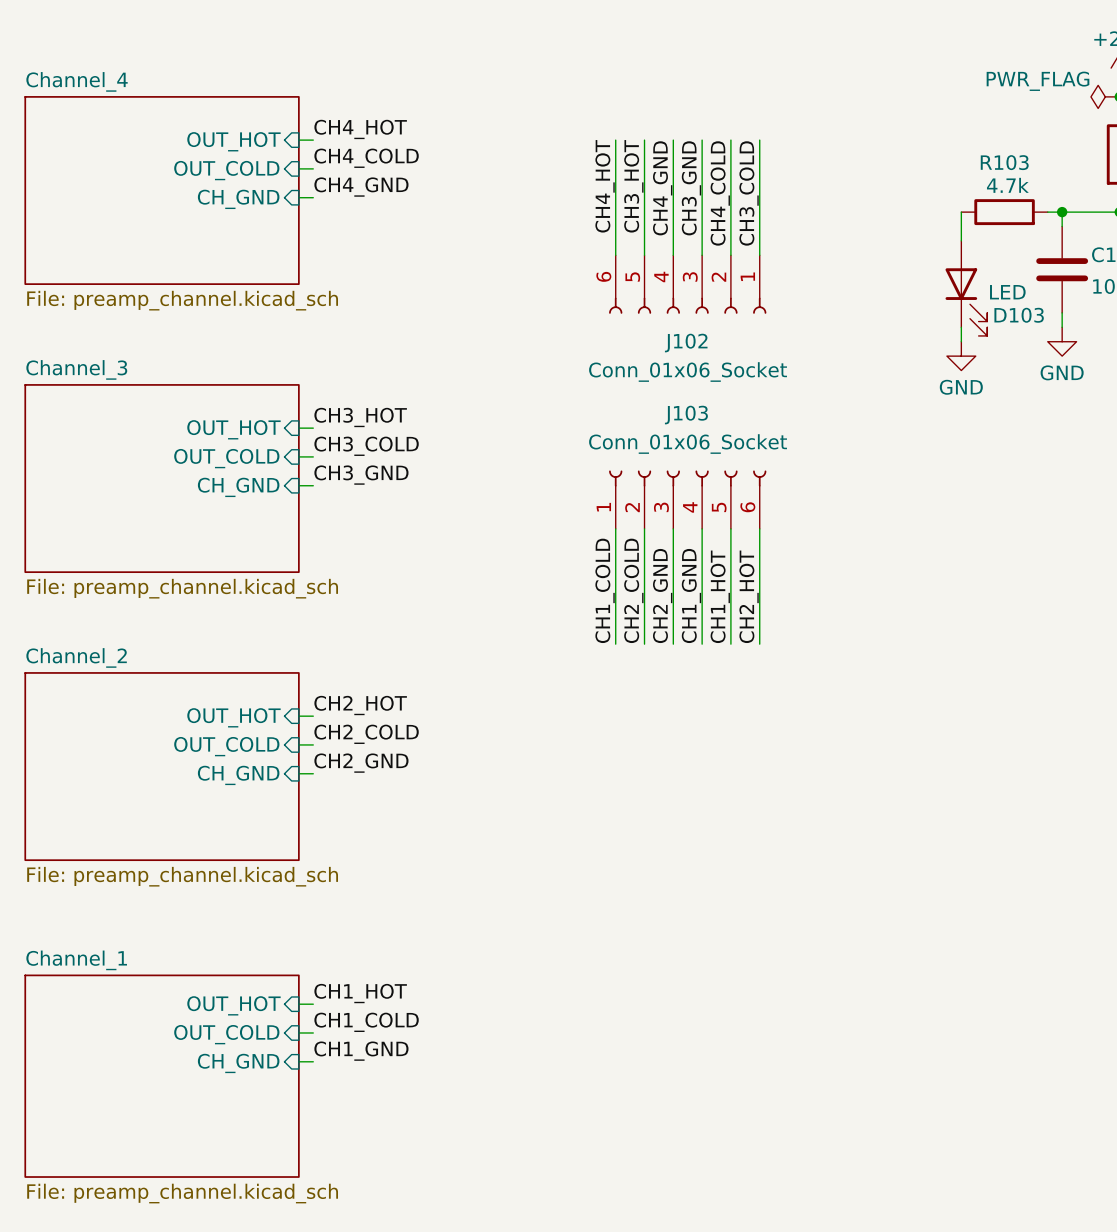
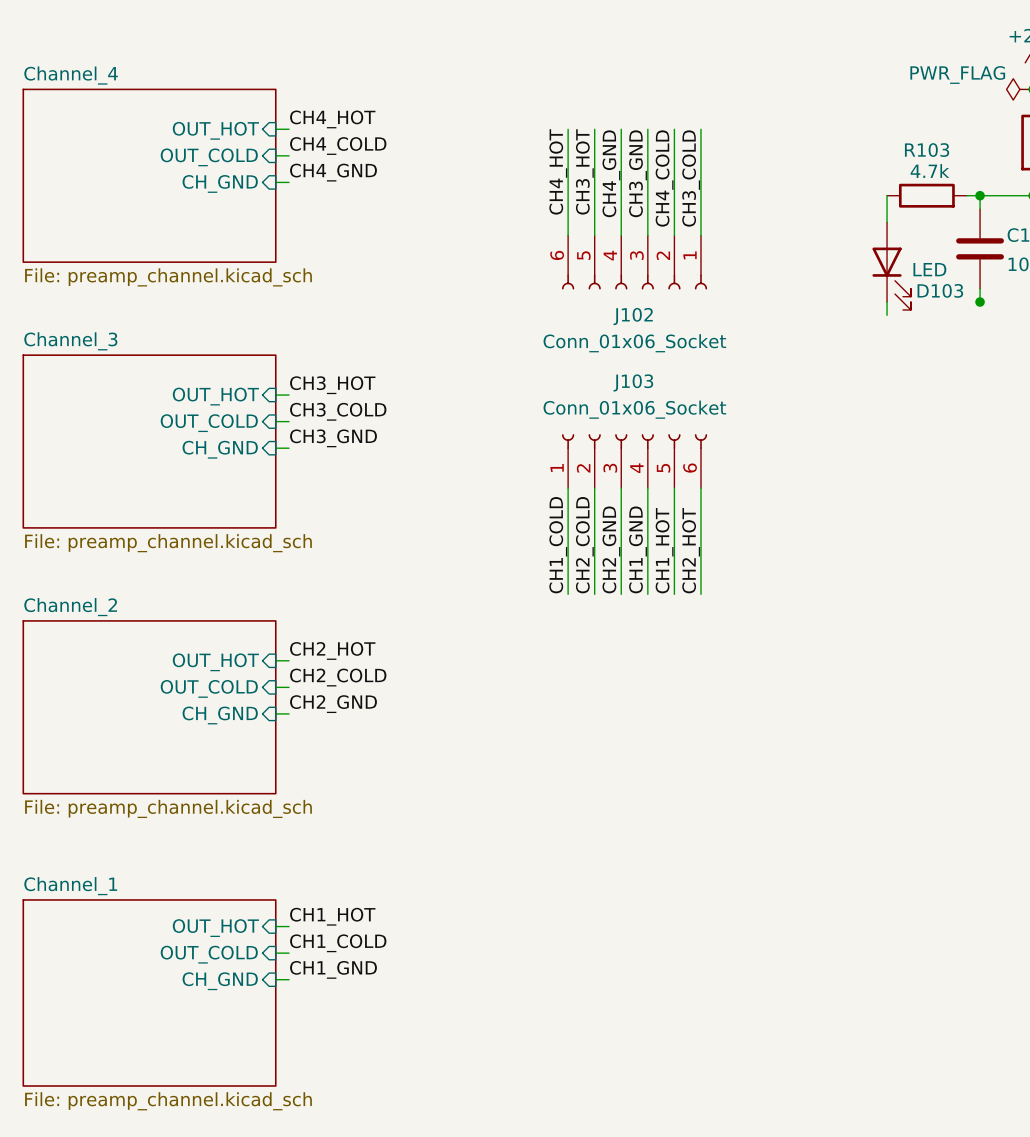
junction: none -> (980, 302)
power symbol: GND (1062, 341) -> none
power symbol: GND (961, 356) -> none

